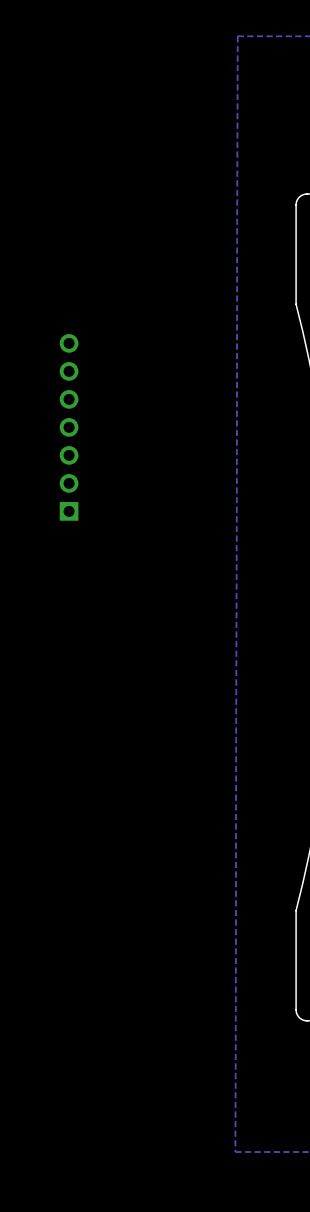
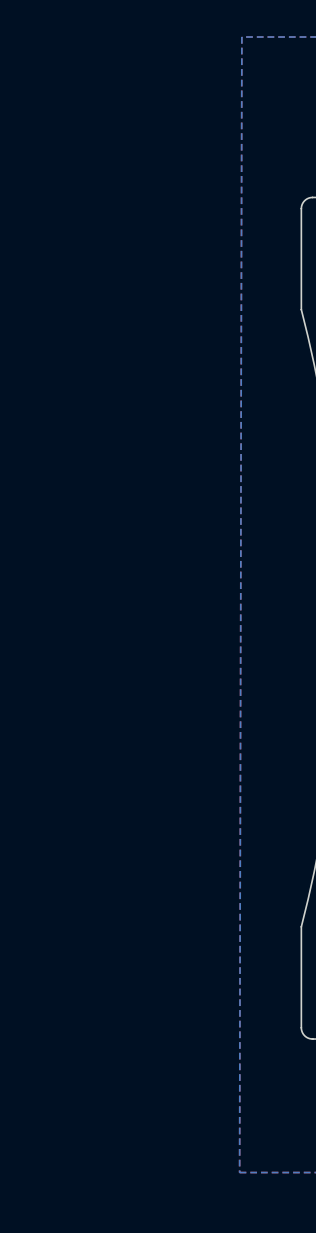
part: (69, 427) -> none

